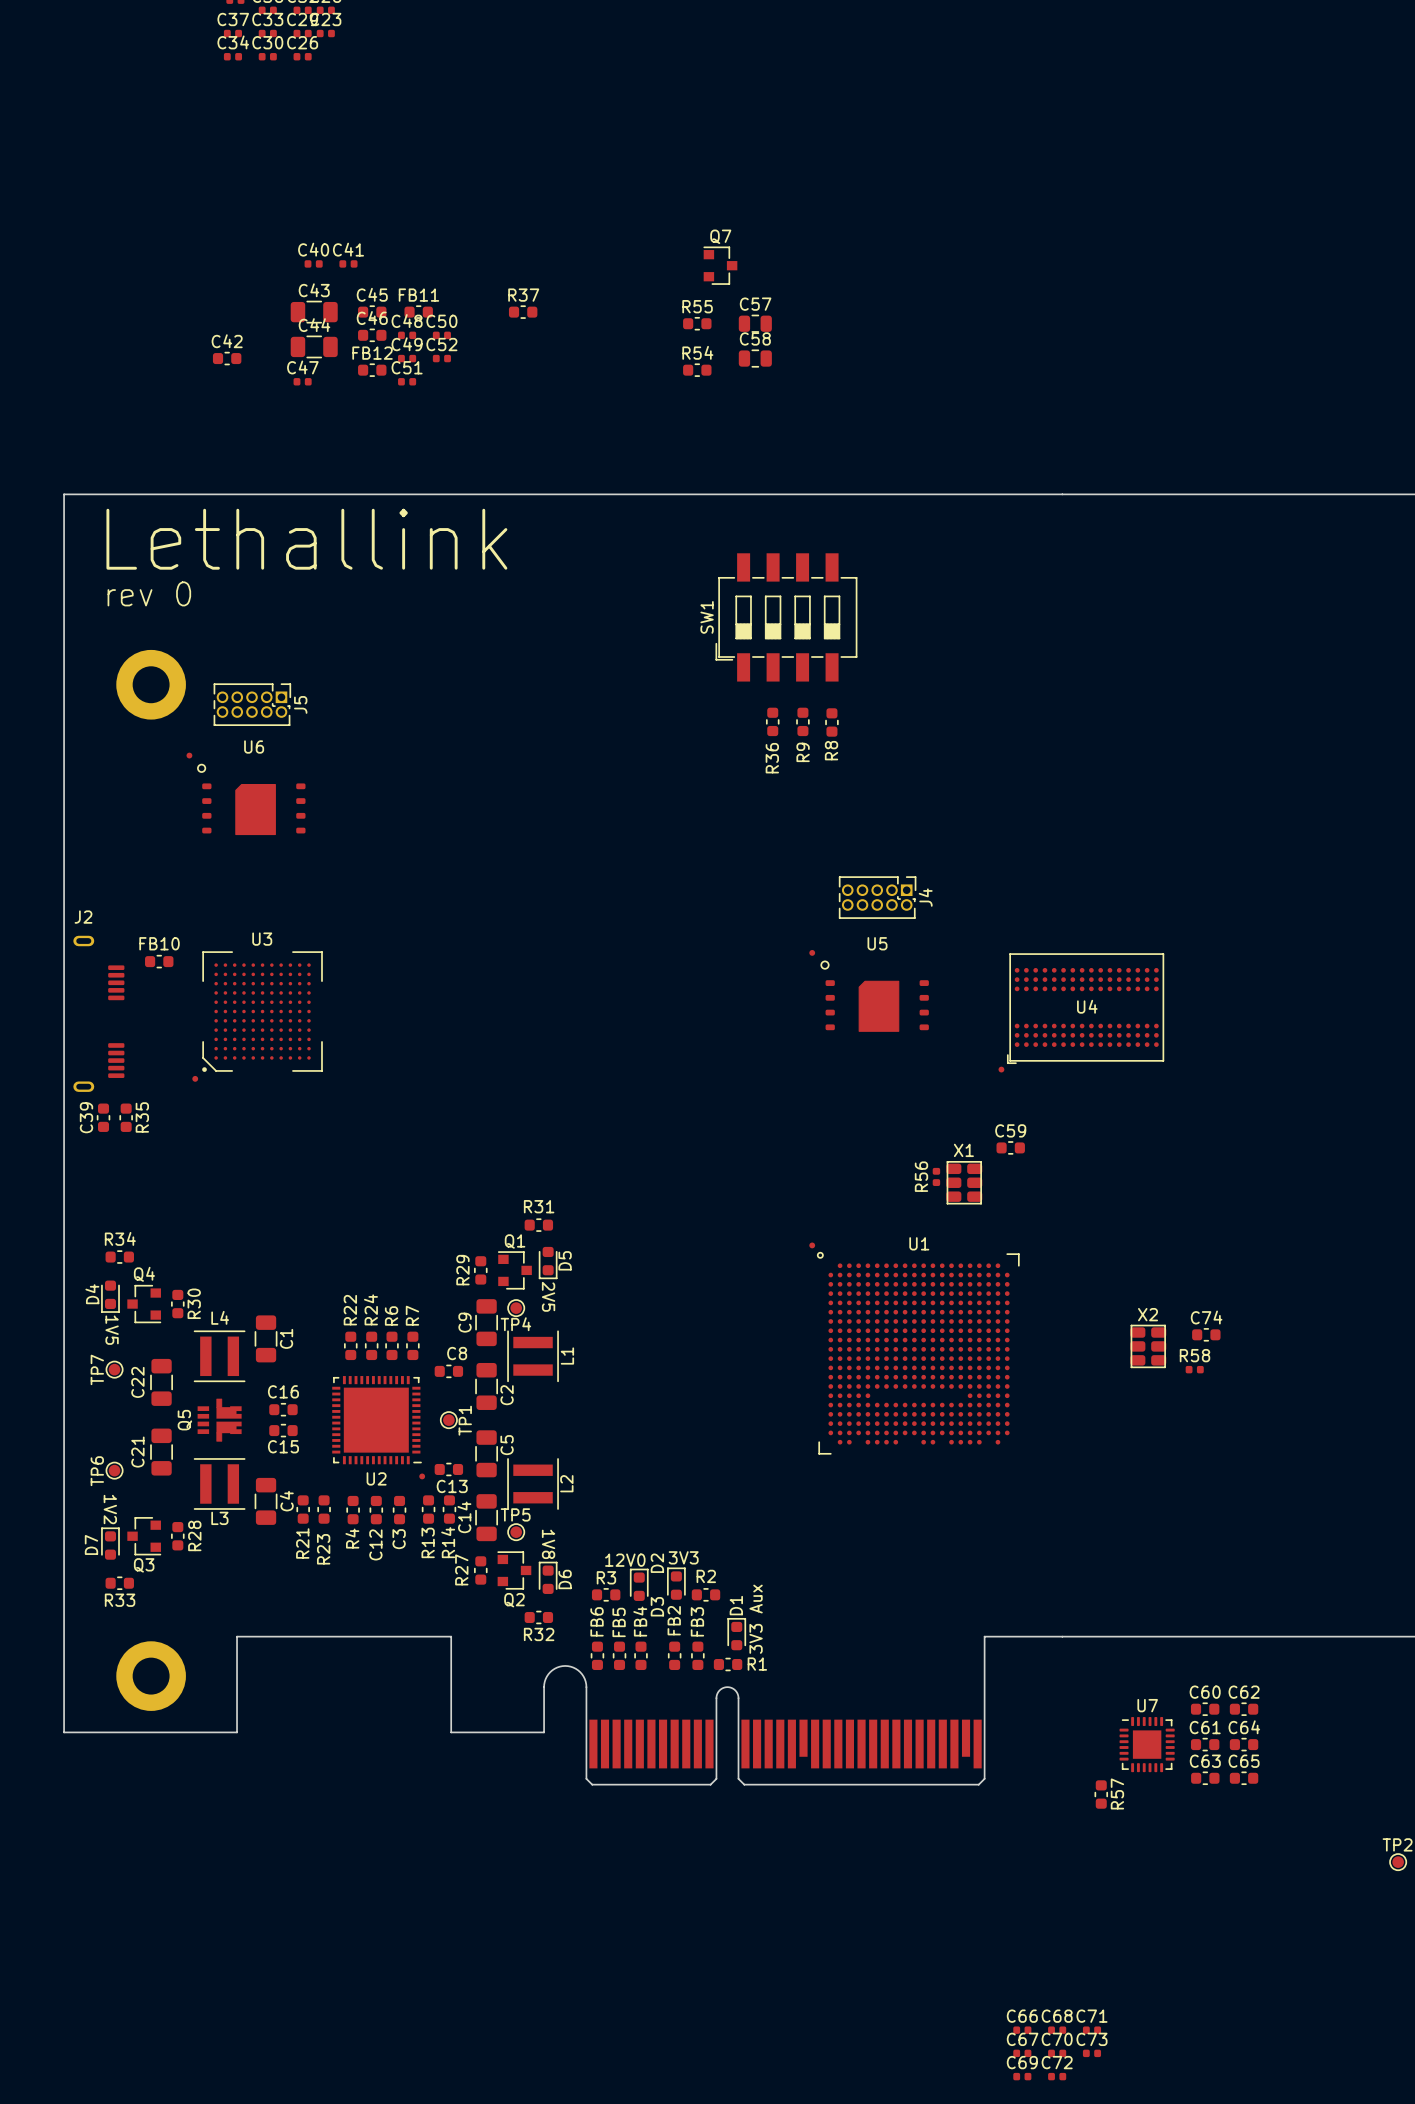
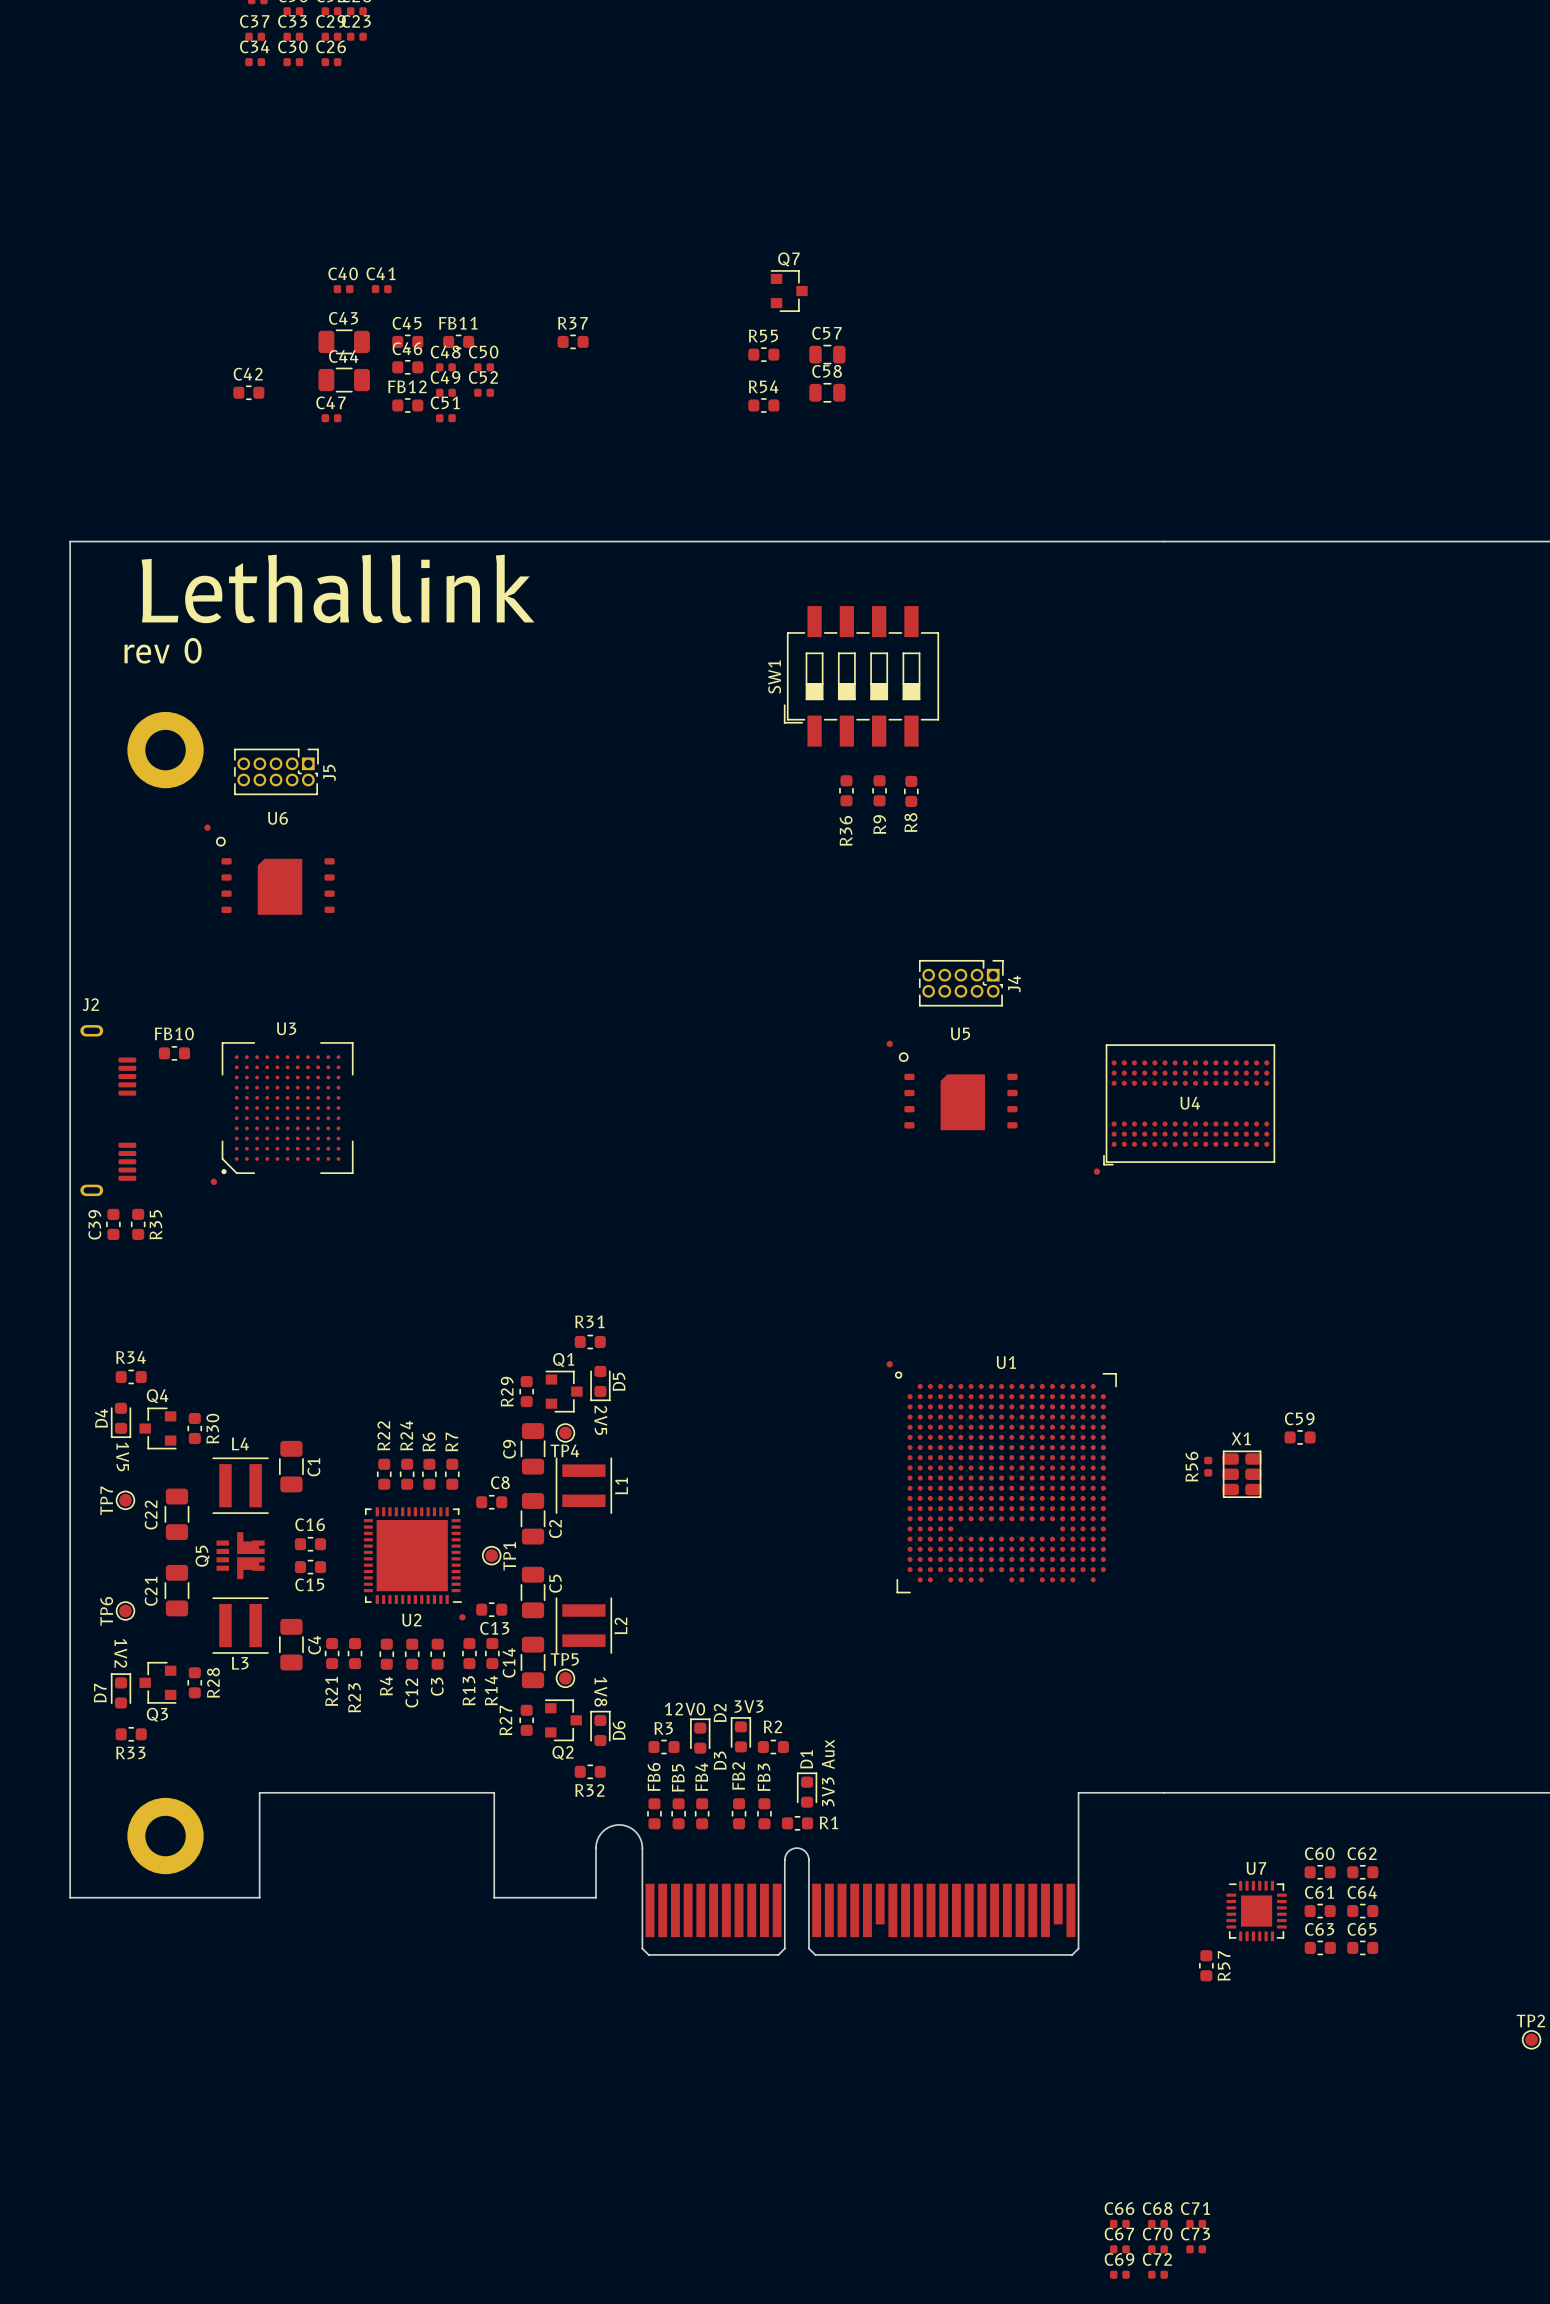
C59 position: (1010, 1147) -> (1300, 1437)
R56 position: (936, 1176) -> (1208, 1466)
X1 position: (964, 1182) -> (1242, 1474)
C74: (1206, 1334) -> none
X2: (1148, 1346) -> none
R58: (1194, 1369) -> none

